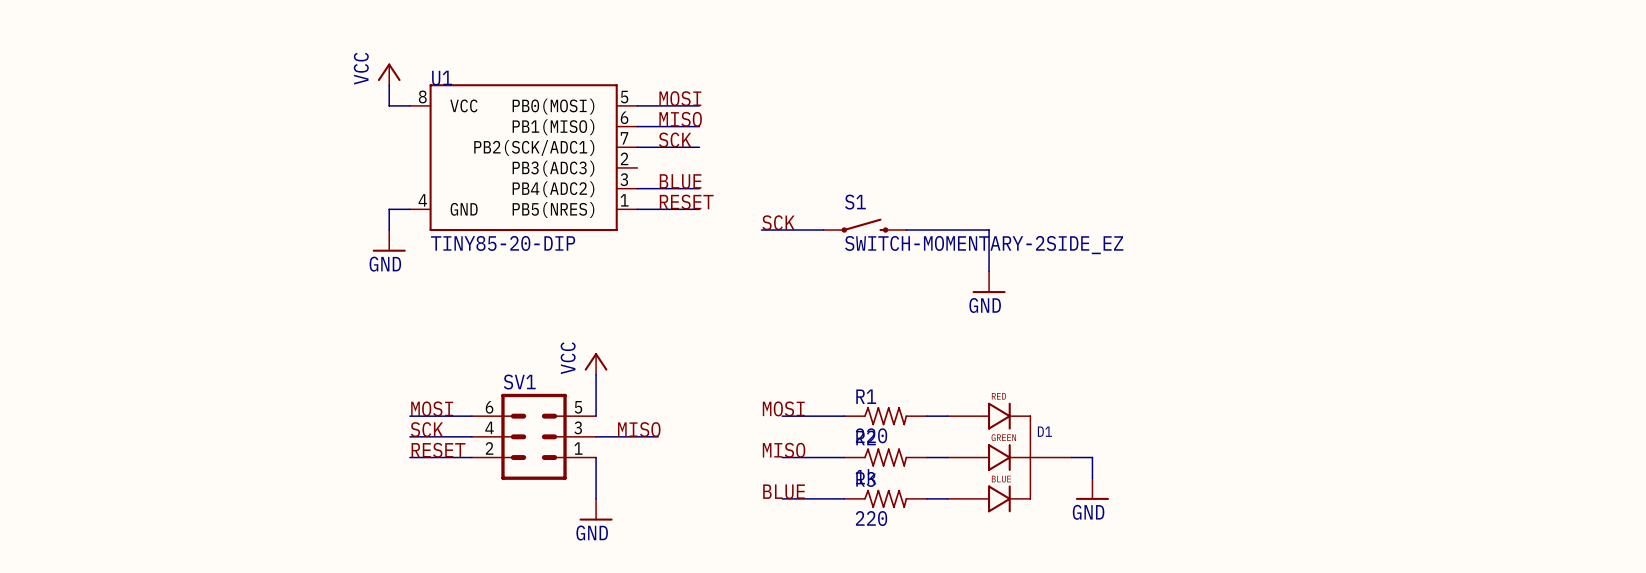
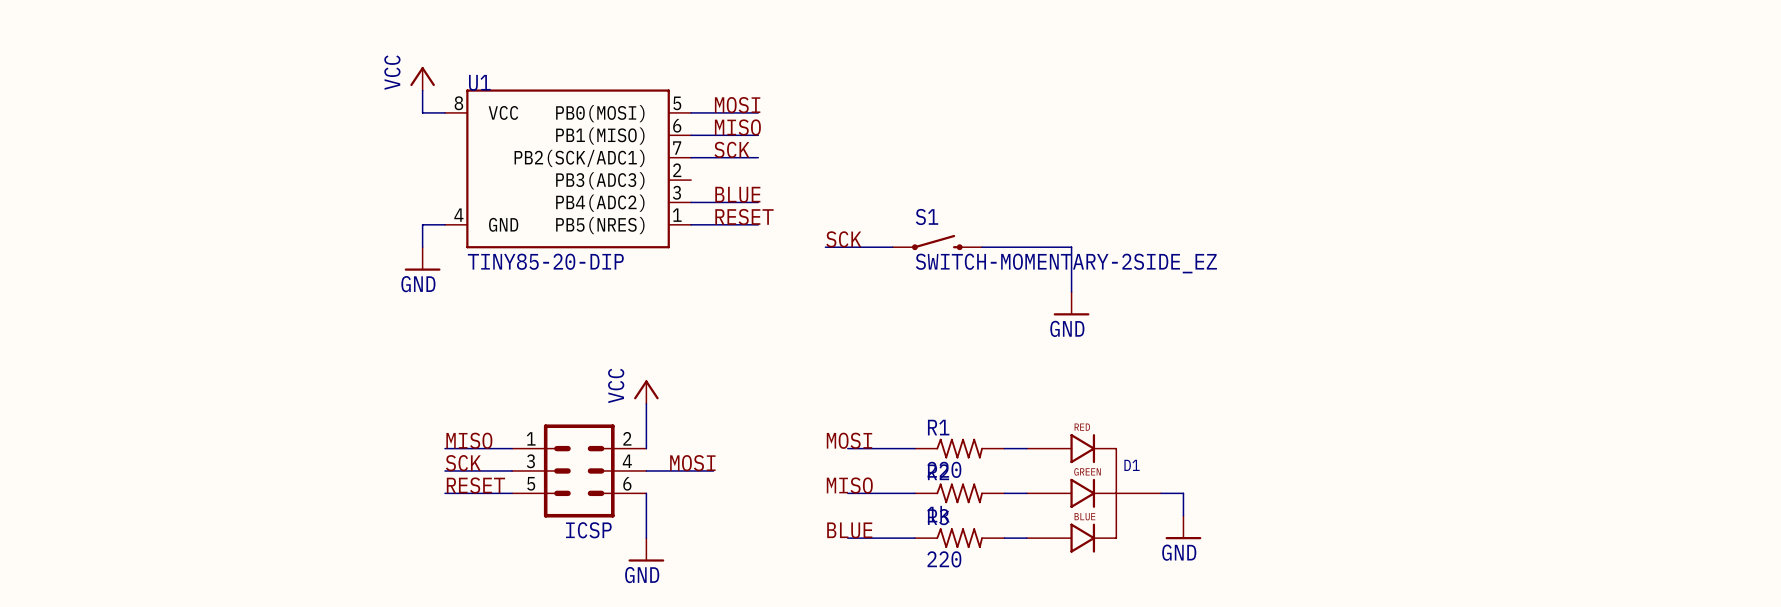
SV1 name: SV1 (519, 382) -> ICSP (588, 530)
label: MOSI (432, 408) -> MISO (469, 440)
label: MISO (639, 429) -> MOSI (692, 463)
SV1 rotation: 0° (534, 436) -> 180° (579, 470)

